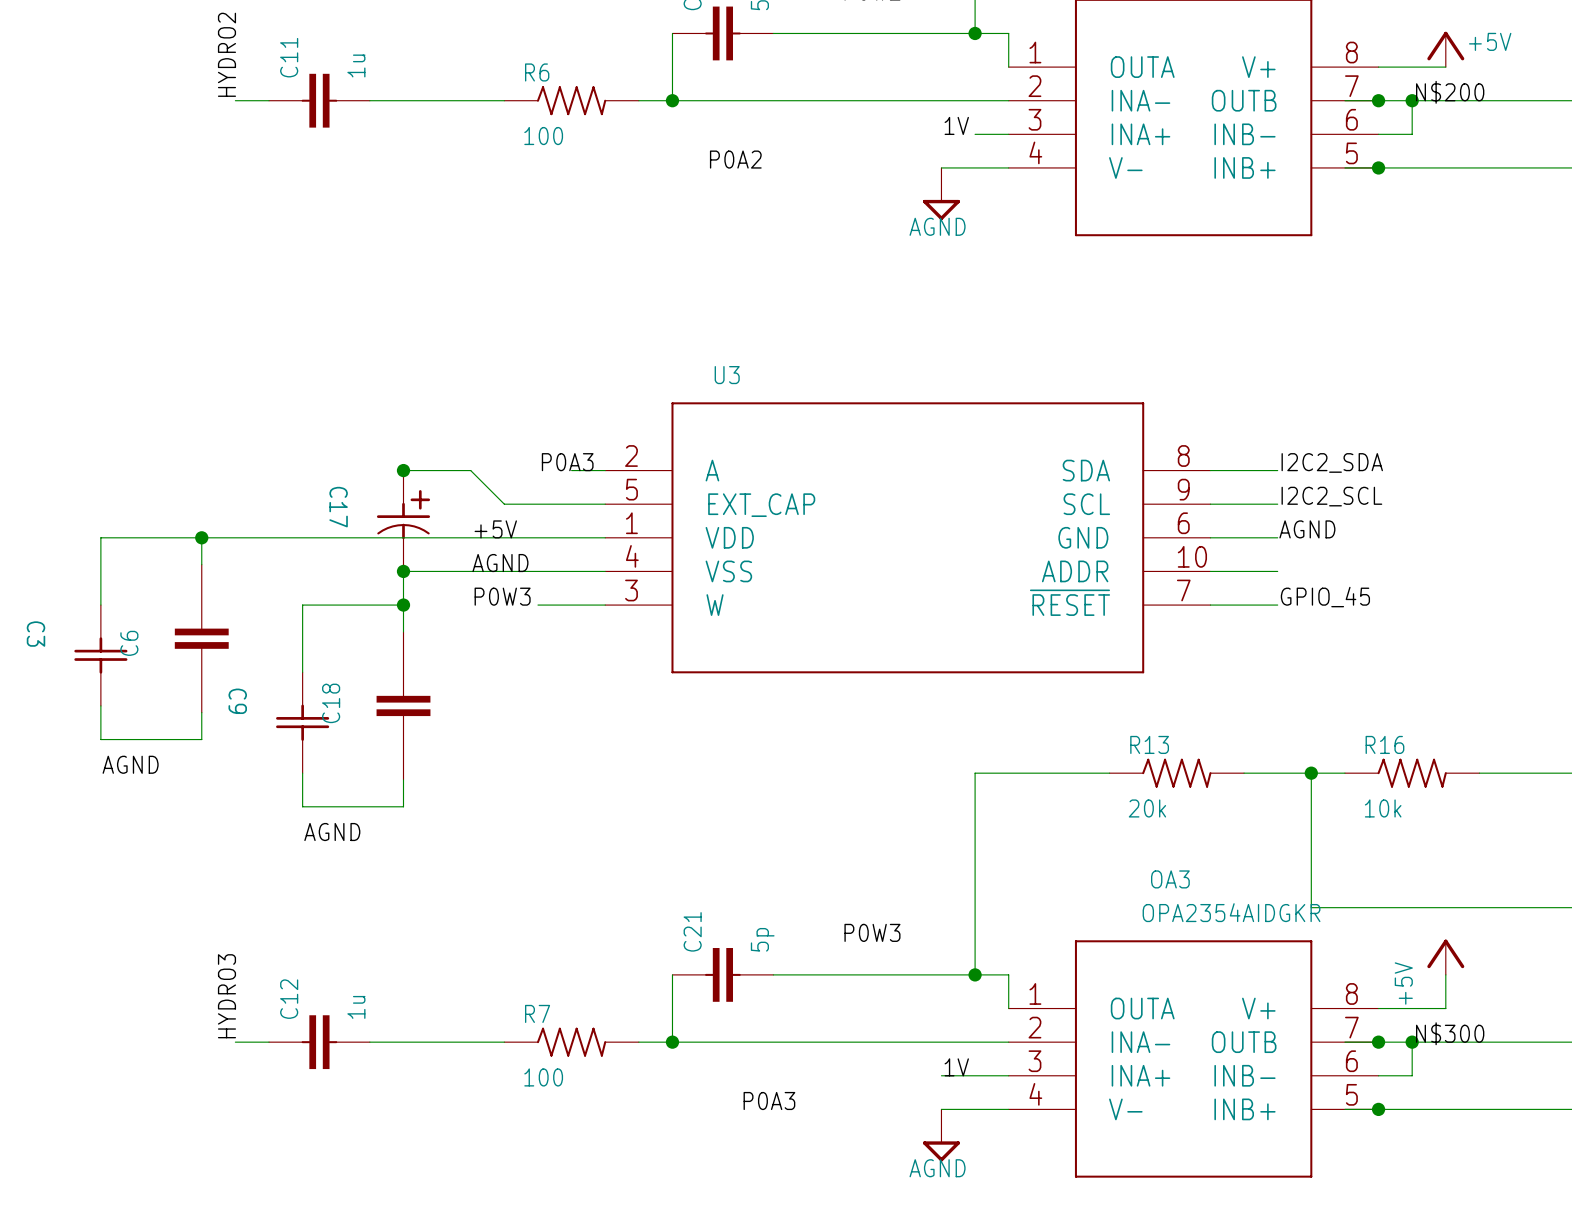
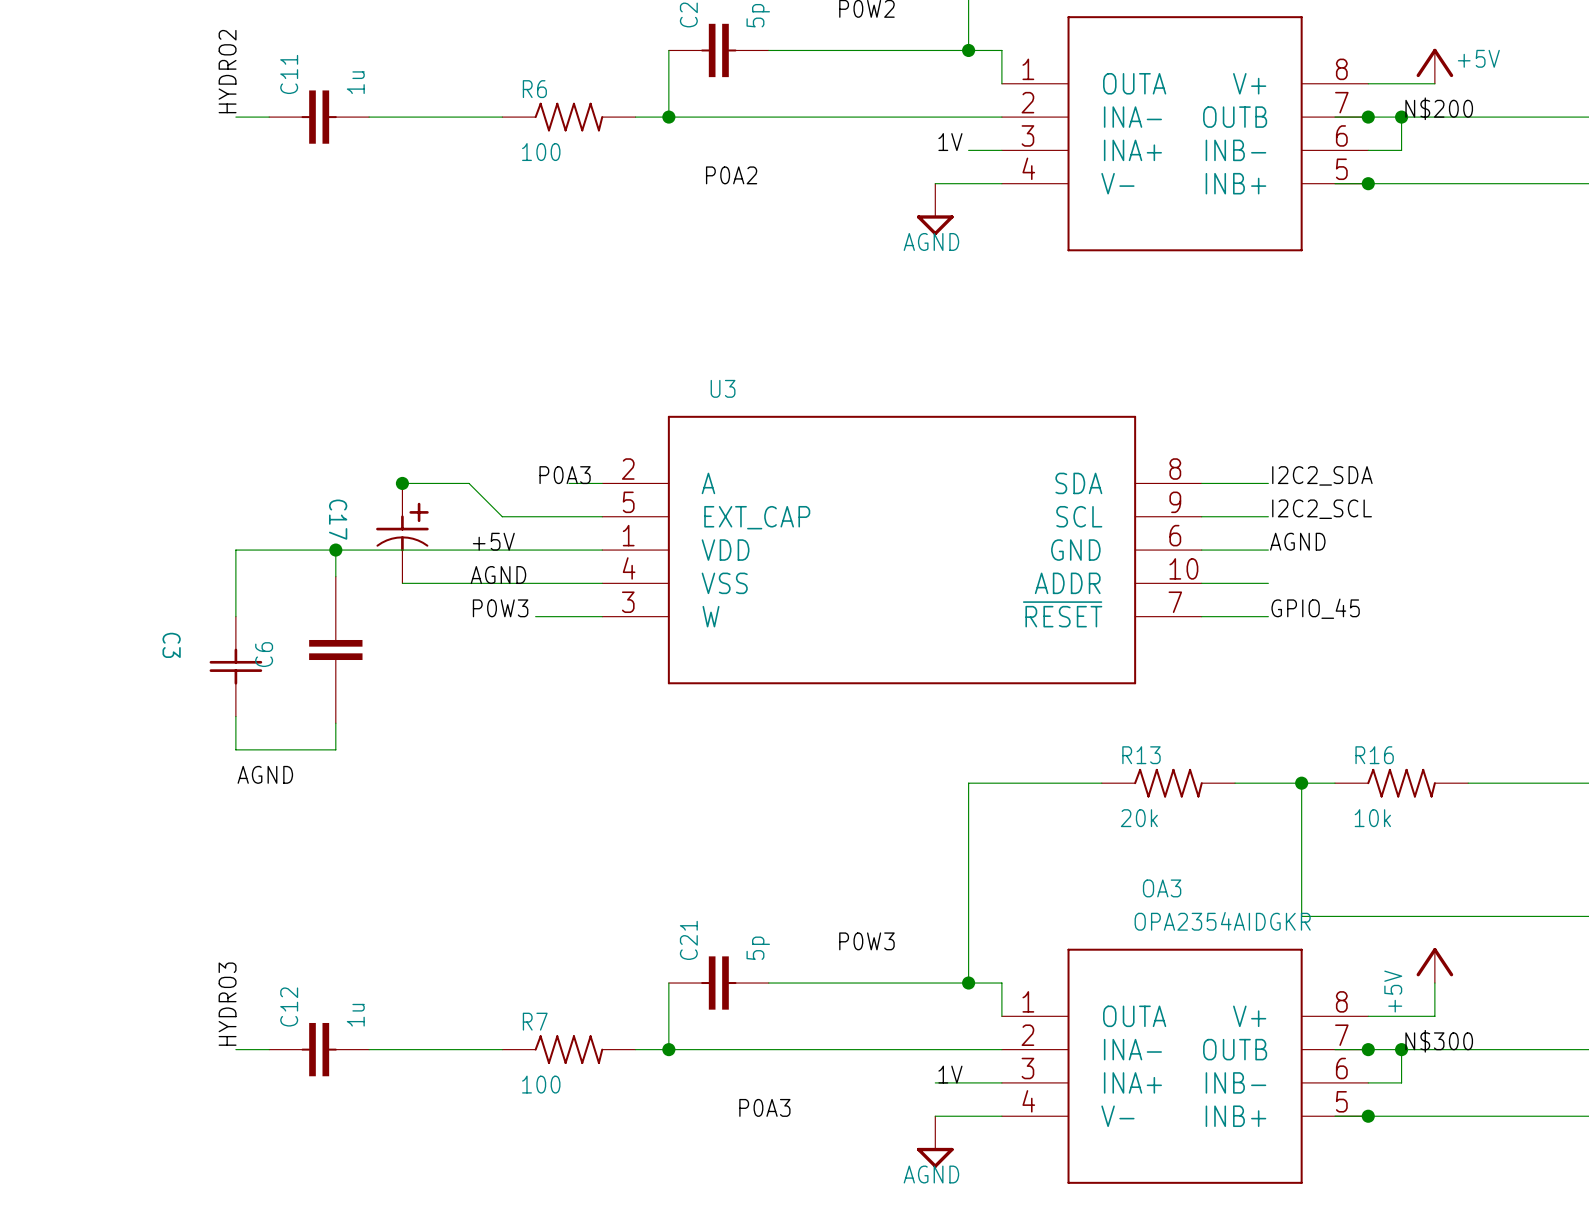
wire: (201, 537) (201, 564) -> (335, 550) (335, 576)
junction: (201, 537) -> none
wire: (235, 537) (100, 537) (100, 605) -> (235, 550) (235, 616)
junction: none -> (335, 550)
wire: (403, 571) (403, 631) -> none
junction: (403, 571) -> none
wire: (403, 605) (302, 605) (302, 672) -> none
junction: (403, 605) -> none
C6 position: (201, 638) -> (335, 649)
C3 position: (100, 655) -> (235, 666)
wire: (100, 705) (100, 739) (201, 739) (201, 712) -> (235, 716) (235, 749) (335, 749) (335, 723)
C18: (403, 705) -> none
C9: (302, 722) -> none
label: AGND (130, 764) -> none
label: none -> AGND (265, 774)
wire: (302, 773) (302, 806) (403, 806) (403, 779) -> none
label: AGND (332, 832) -> none

